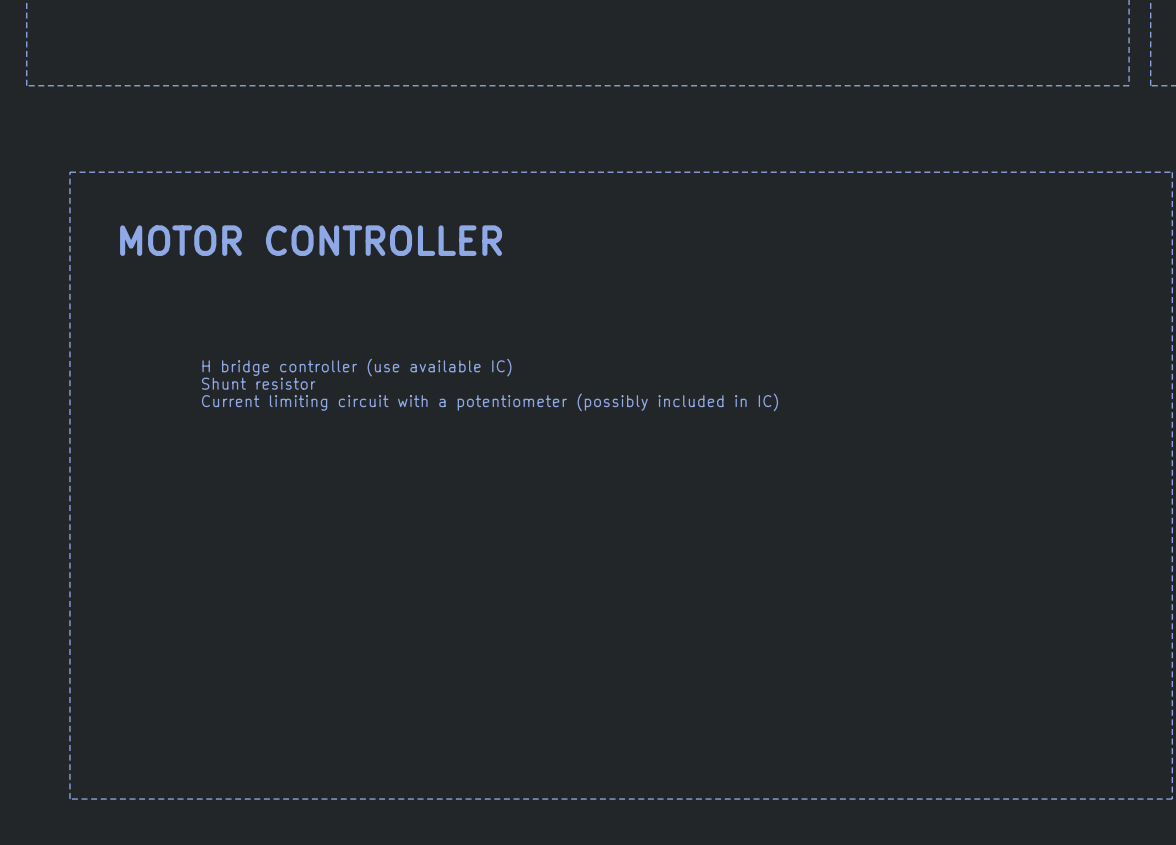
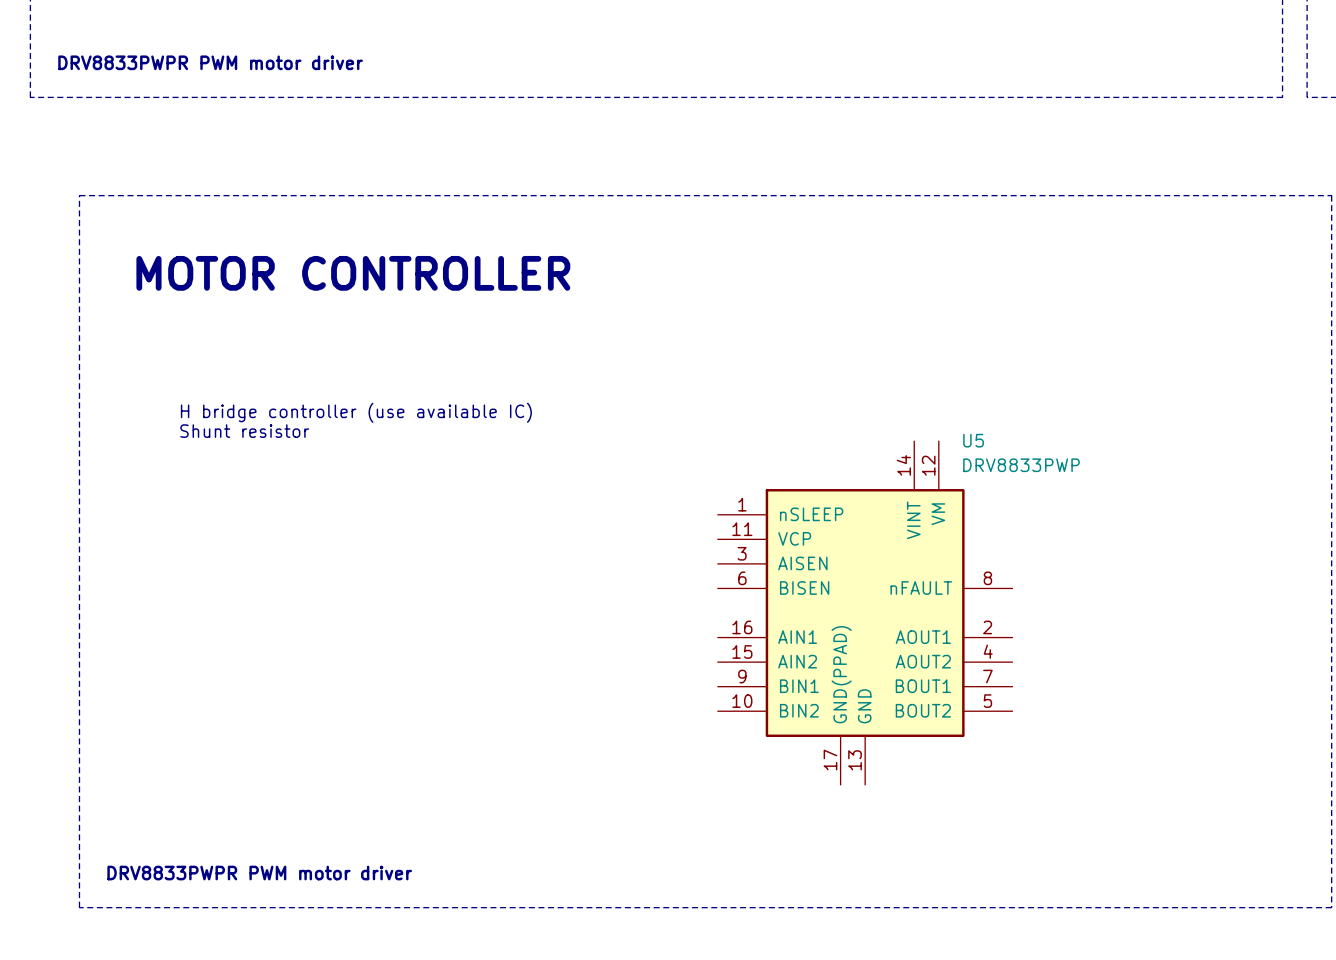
text: none -> DRV8833PWPR PWM motor driver (210, 62)
text position: H bridge controller (use available IC) (356, 367) -> H bridge controller (use available IC) (356, 412)
text position: Shunt resistor (258, 383) -> Shunt resistor (244, 431)
text: Current limiting circuit with a potentiometer (possibly included in IC) (489, 402) -> none
U5: none -> DRV8833PWP (865, 613)
text: none -> DRV8833PWPR PWM motor driver (259, 873)

